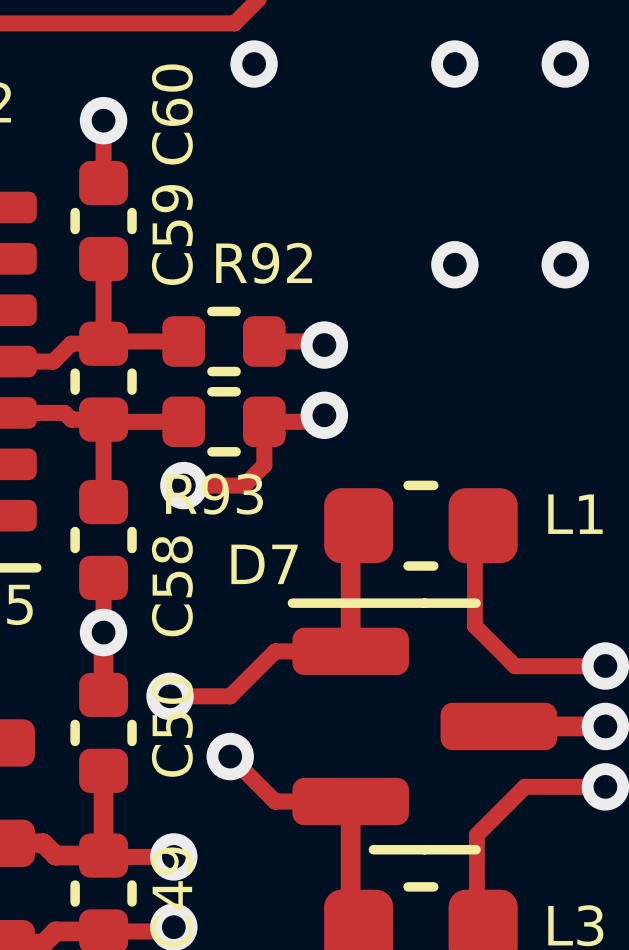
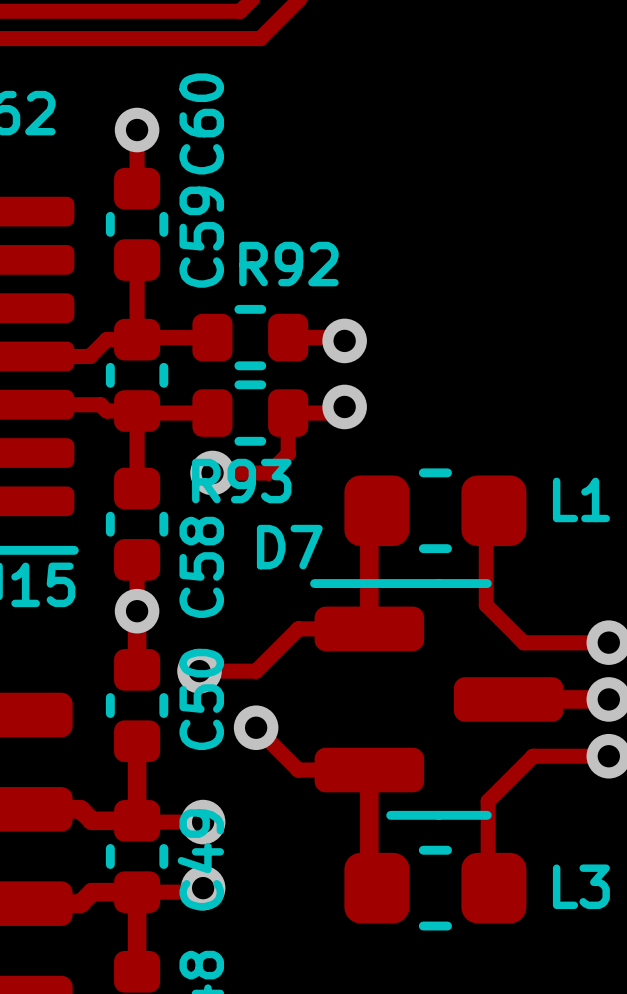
via: (254, 64) -> none
via: (454, 64) -> none
via: (565, 64) -> none
via: (454, 264) -> none
via: (565, 264) -> none

